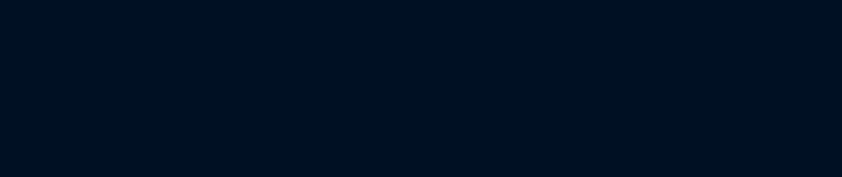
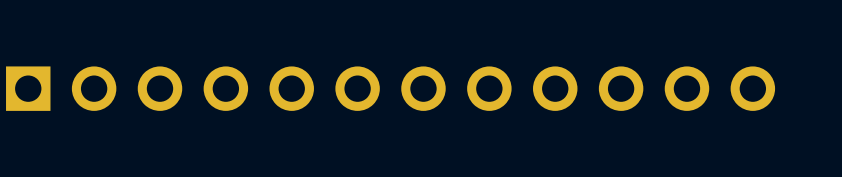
part: none -> (390, 88)

